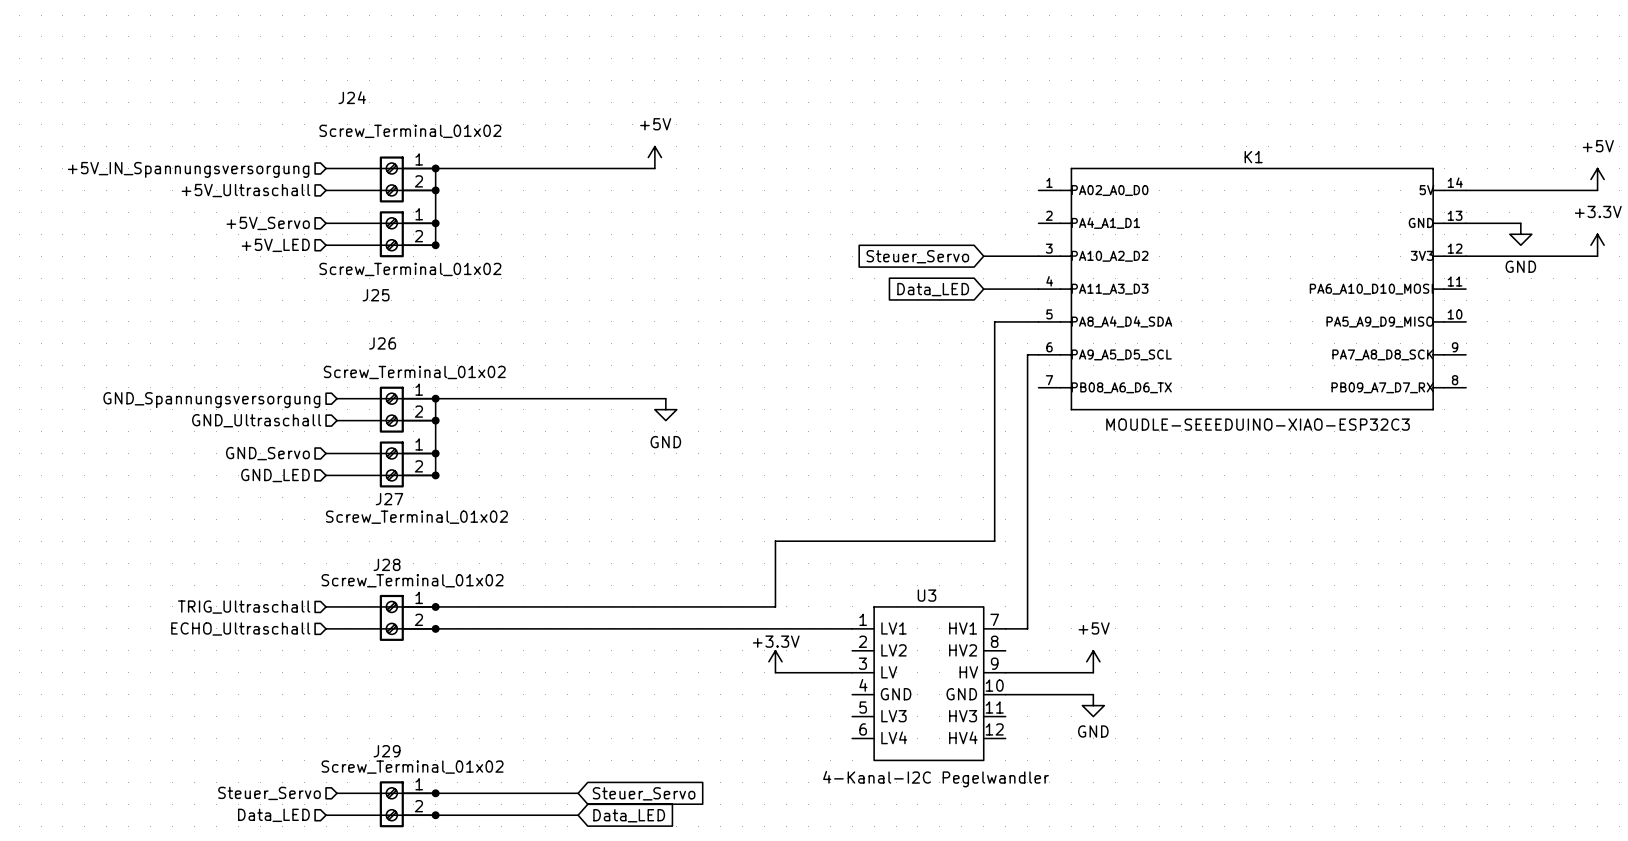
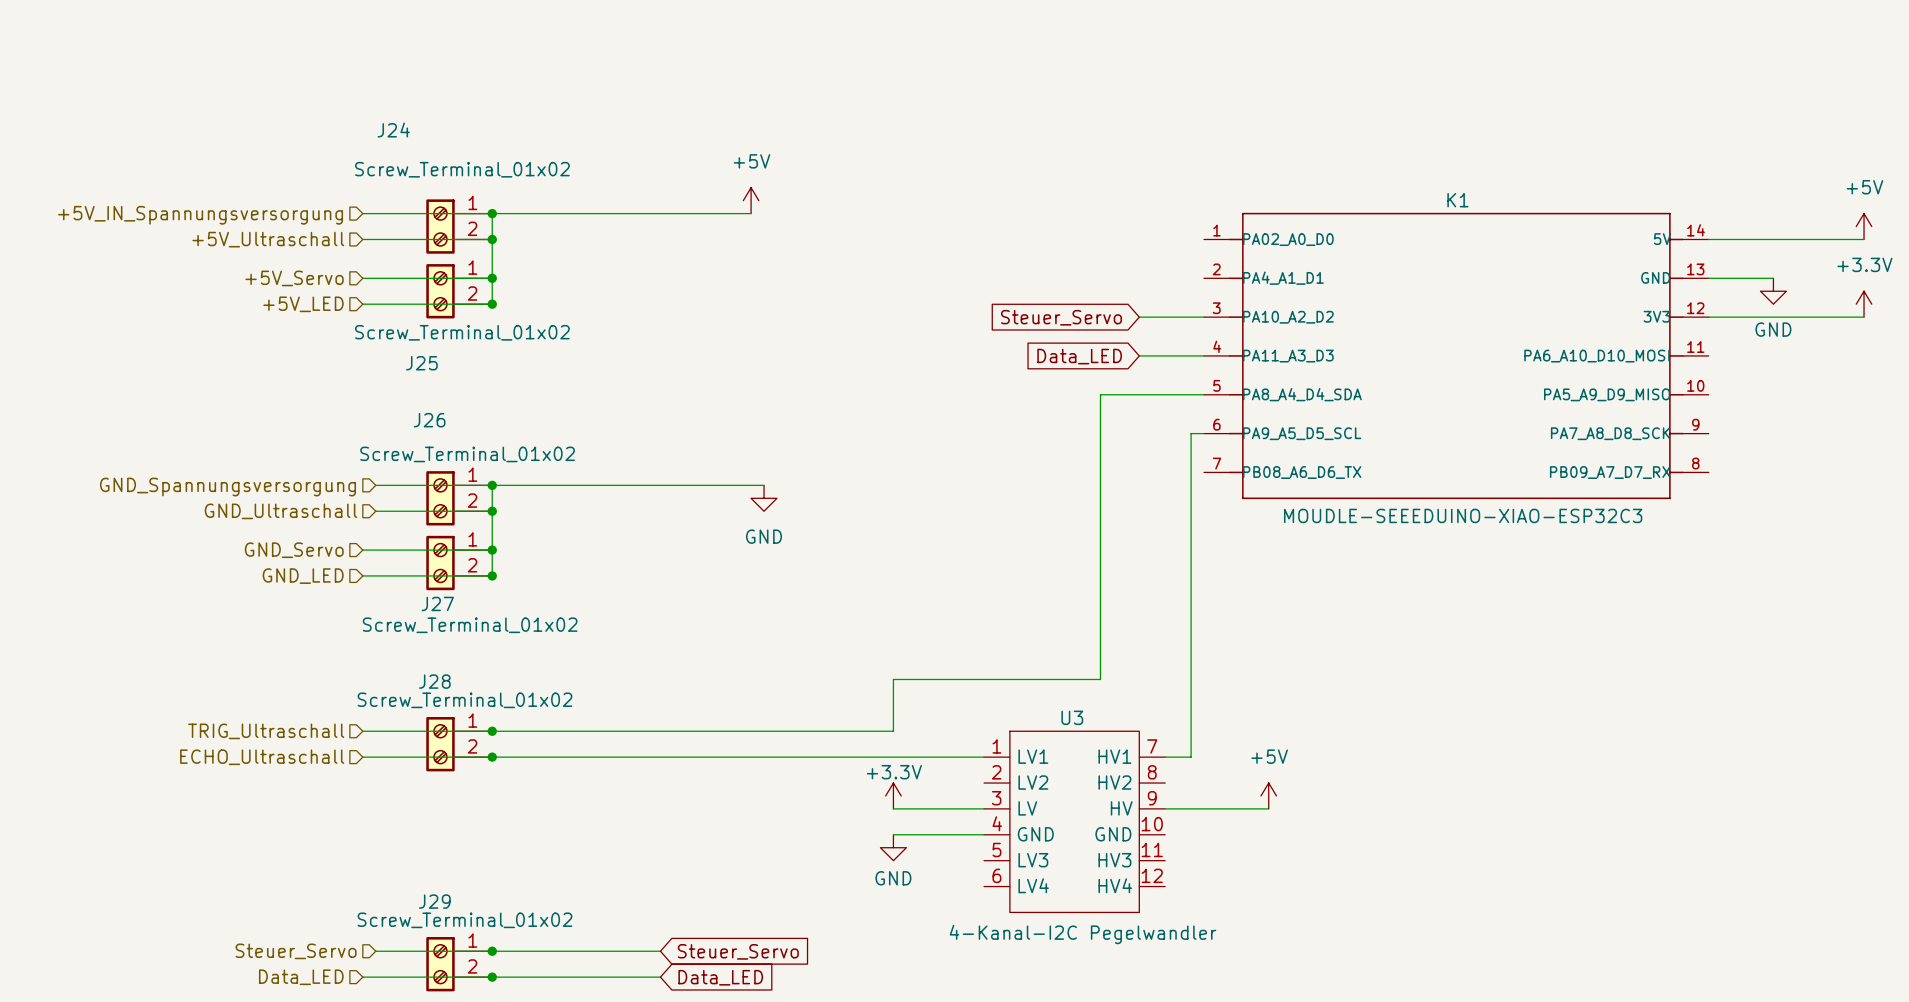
wire: (994, 321) (994, 541) (775, 541) (775, 563) -> (1152, 394) (1100, 394) (1100, 679) (893, 679)
wire: none -> (893, 834) (984, 834)
wire: (1005, 694) (1093, 694) -> none
power symbol: none -> GND (893, 847)
power symbol: GND (1093, 705) -> none

